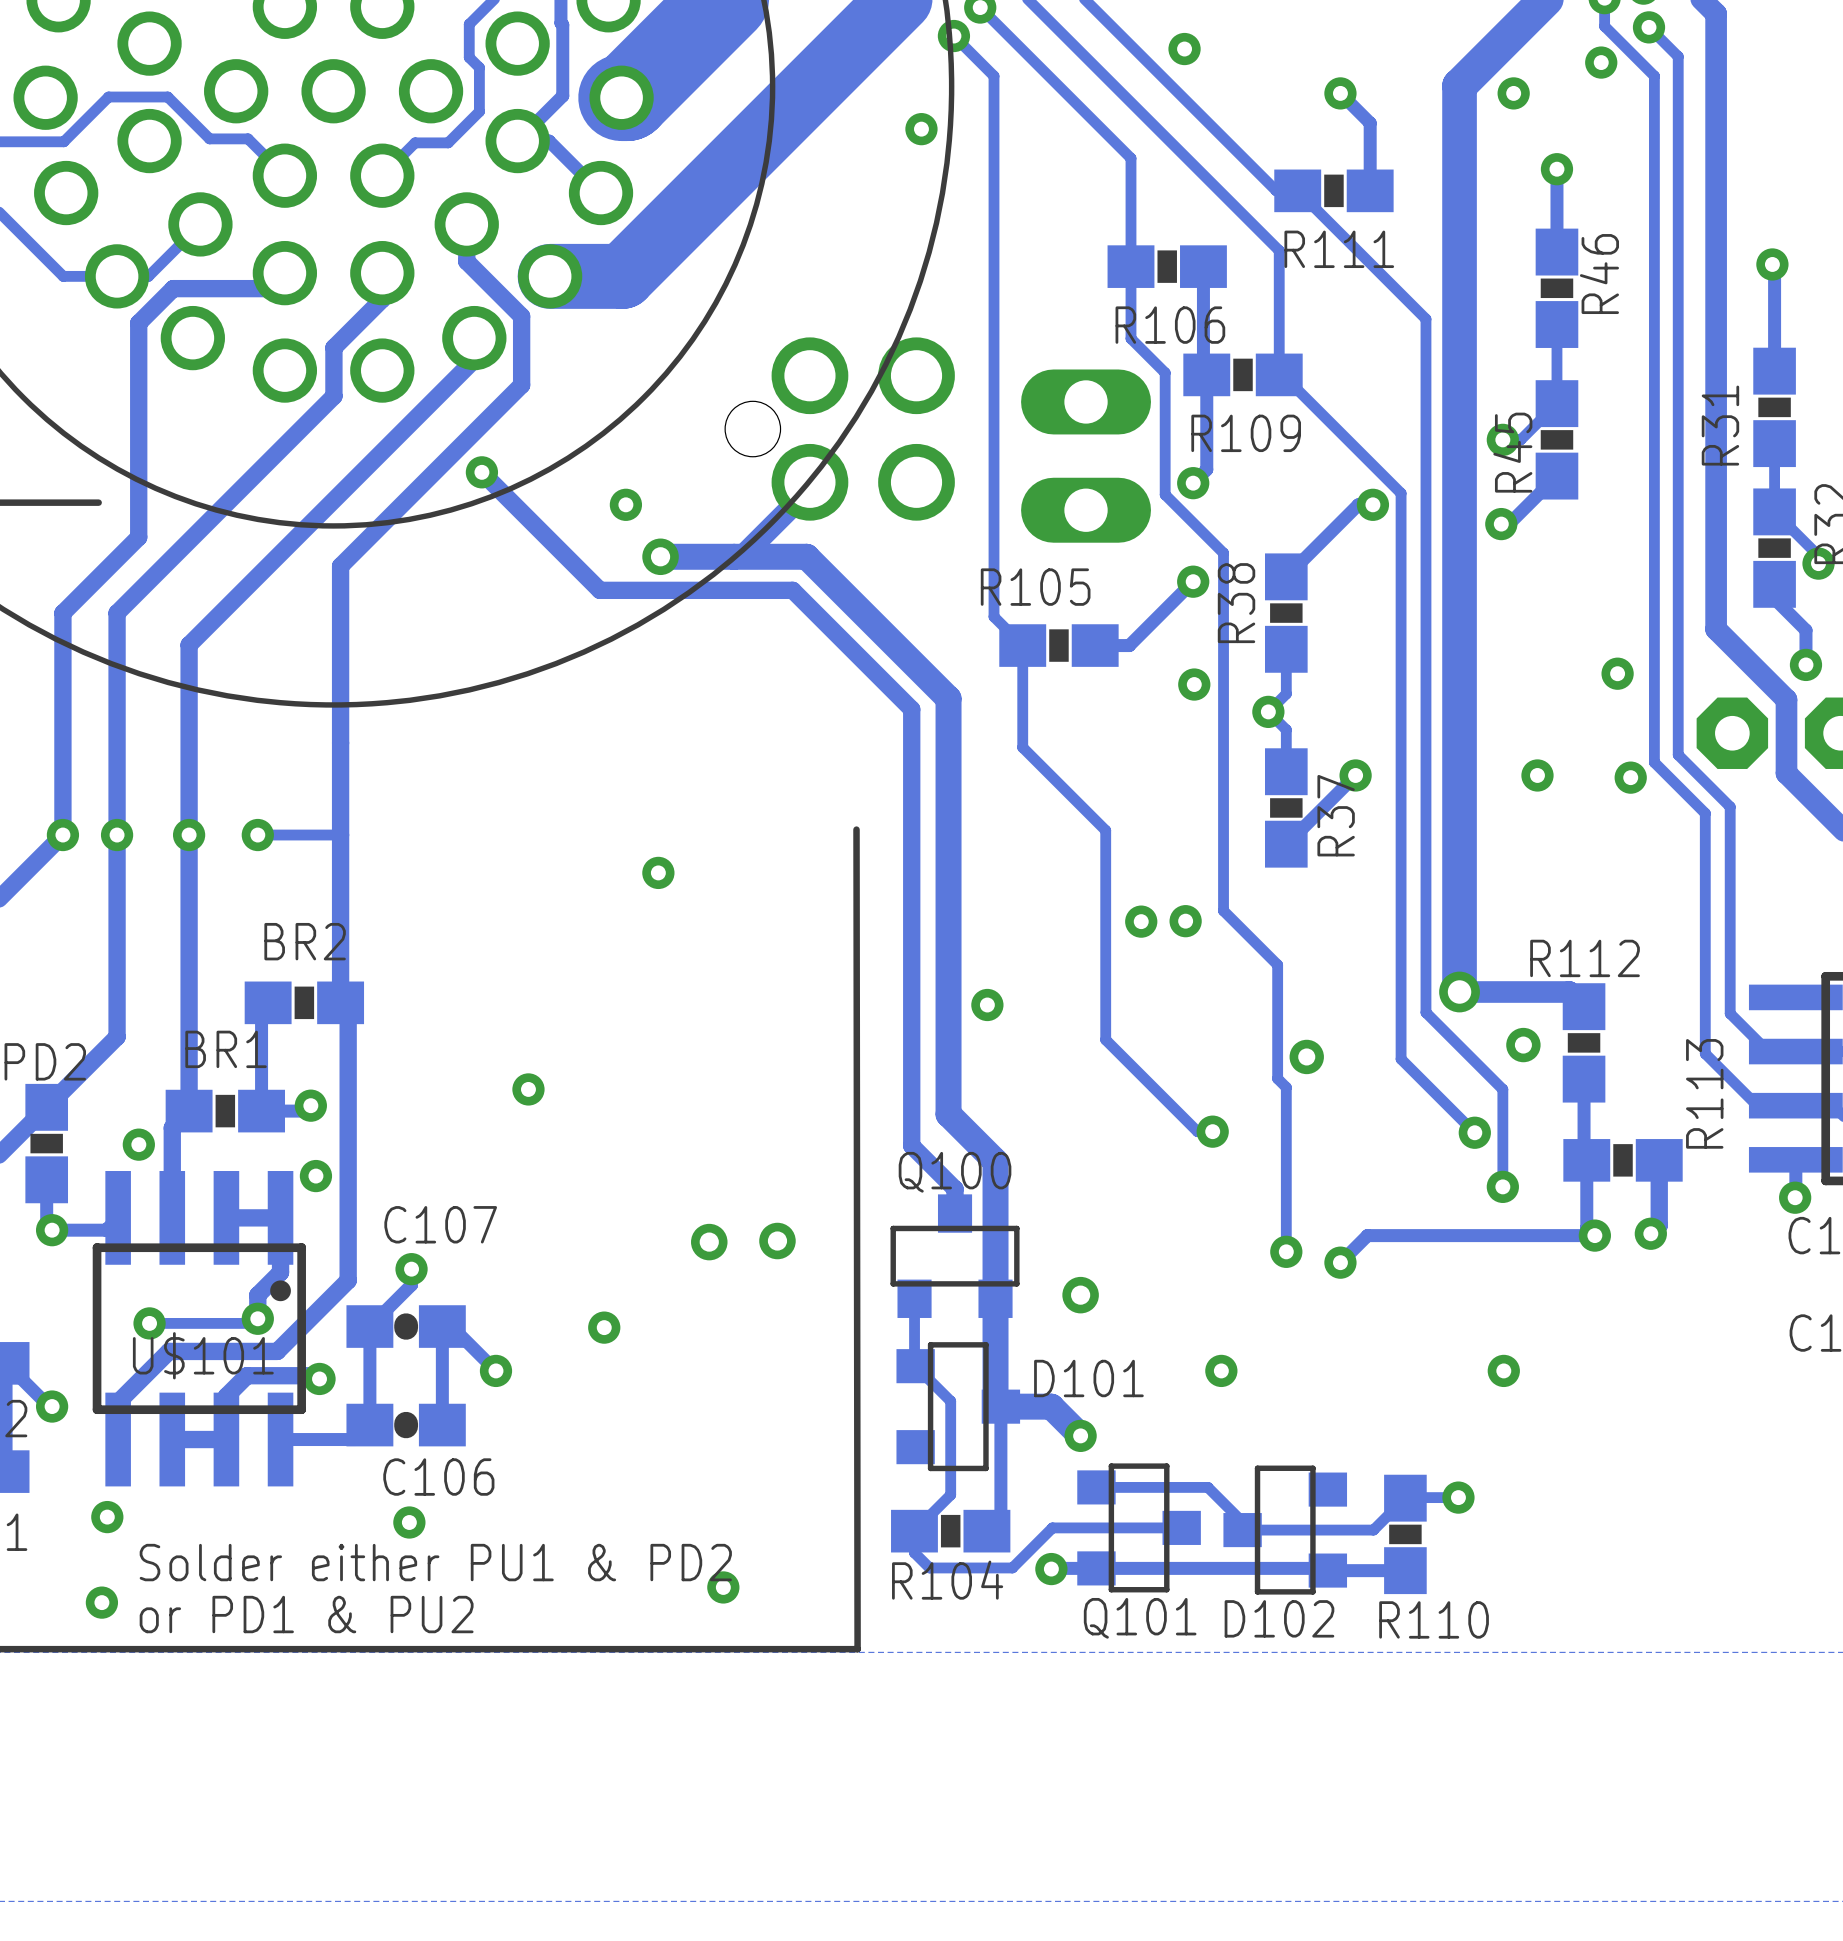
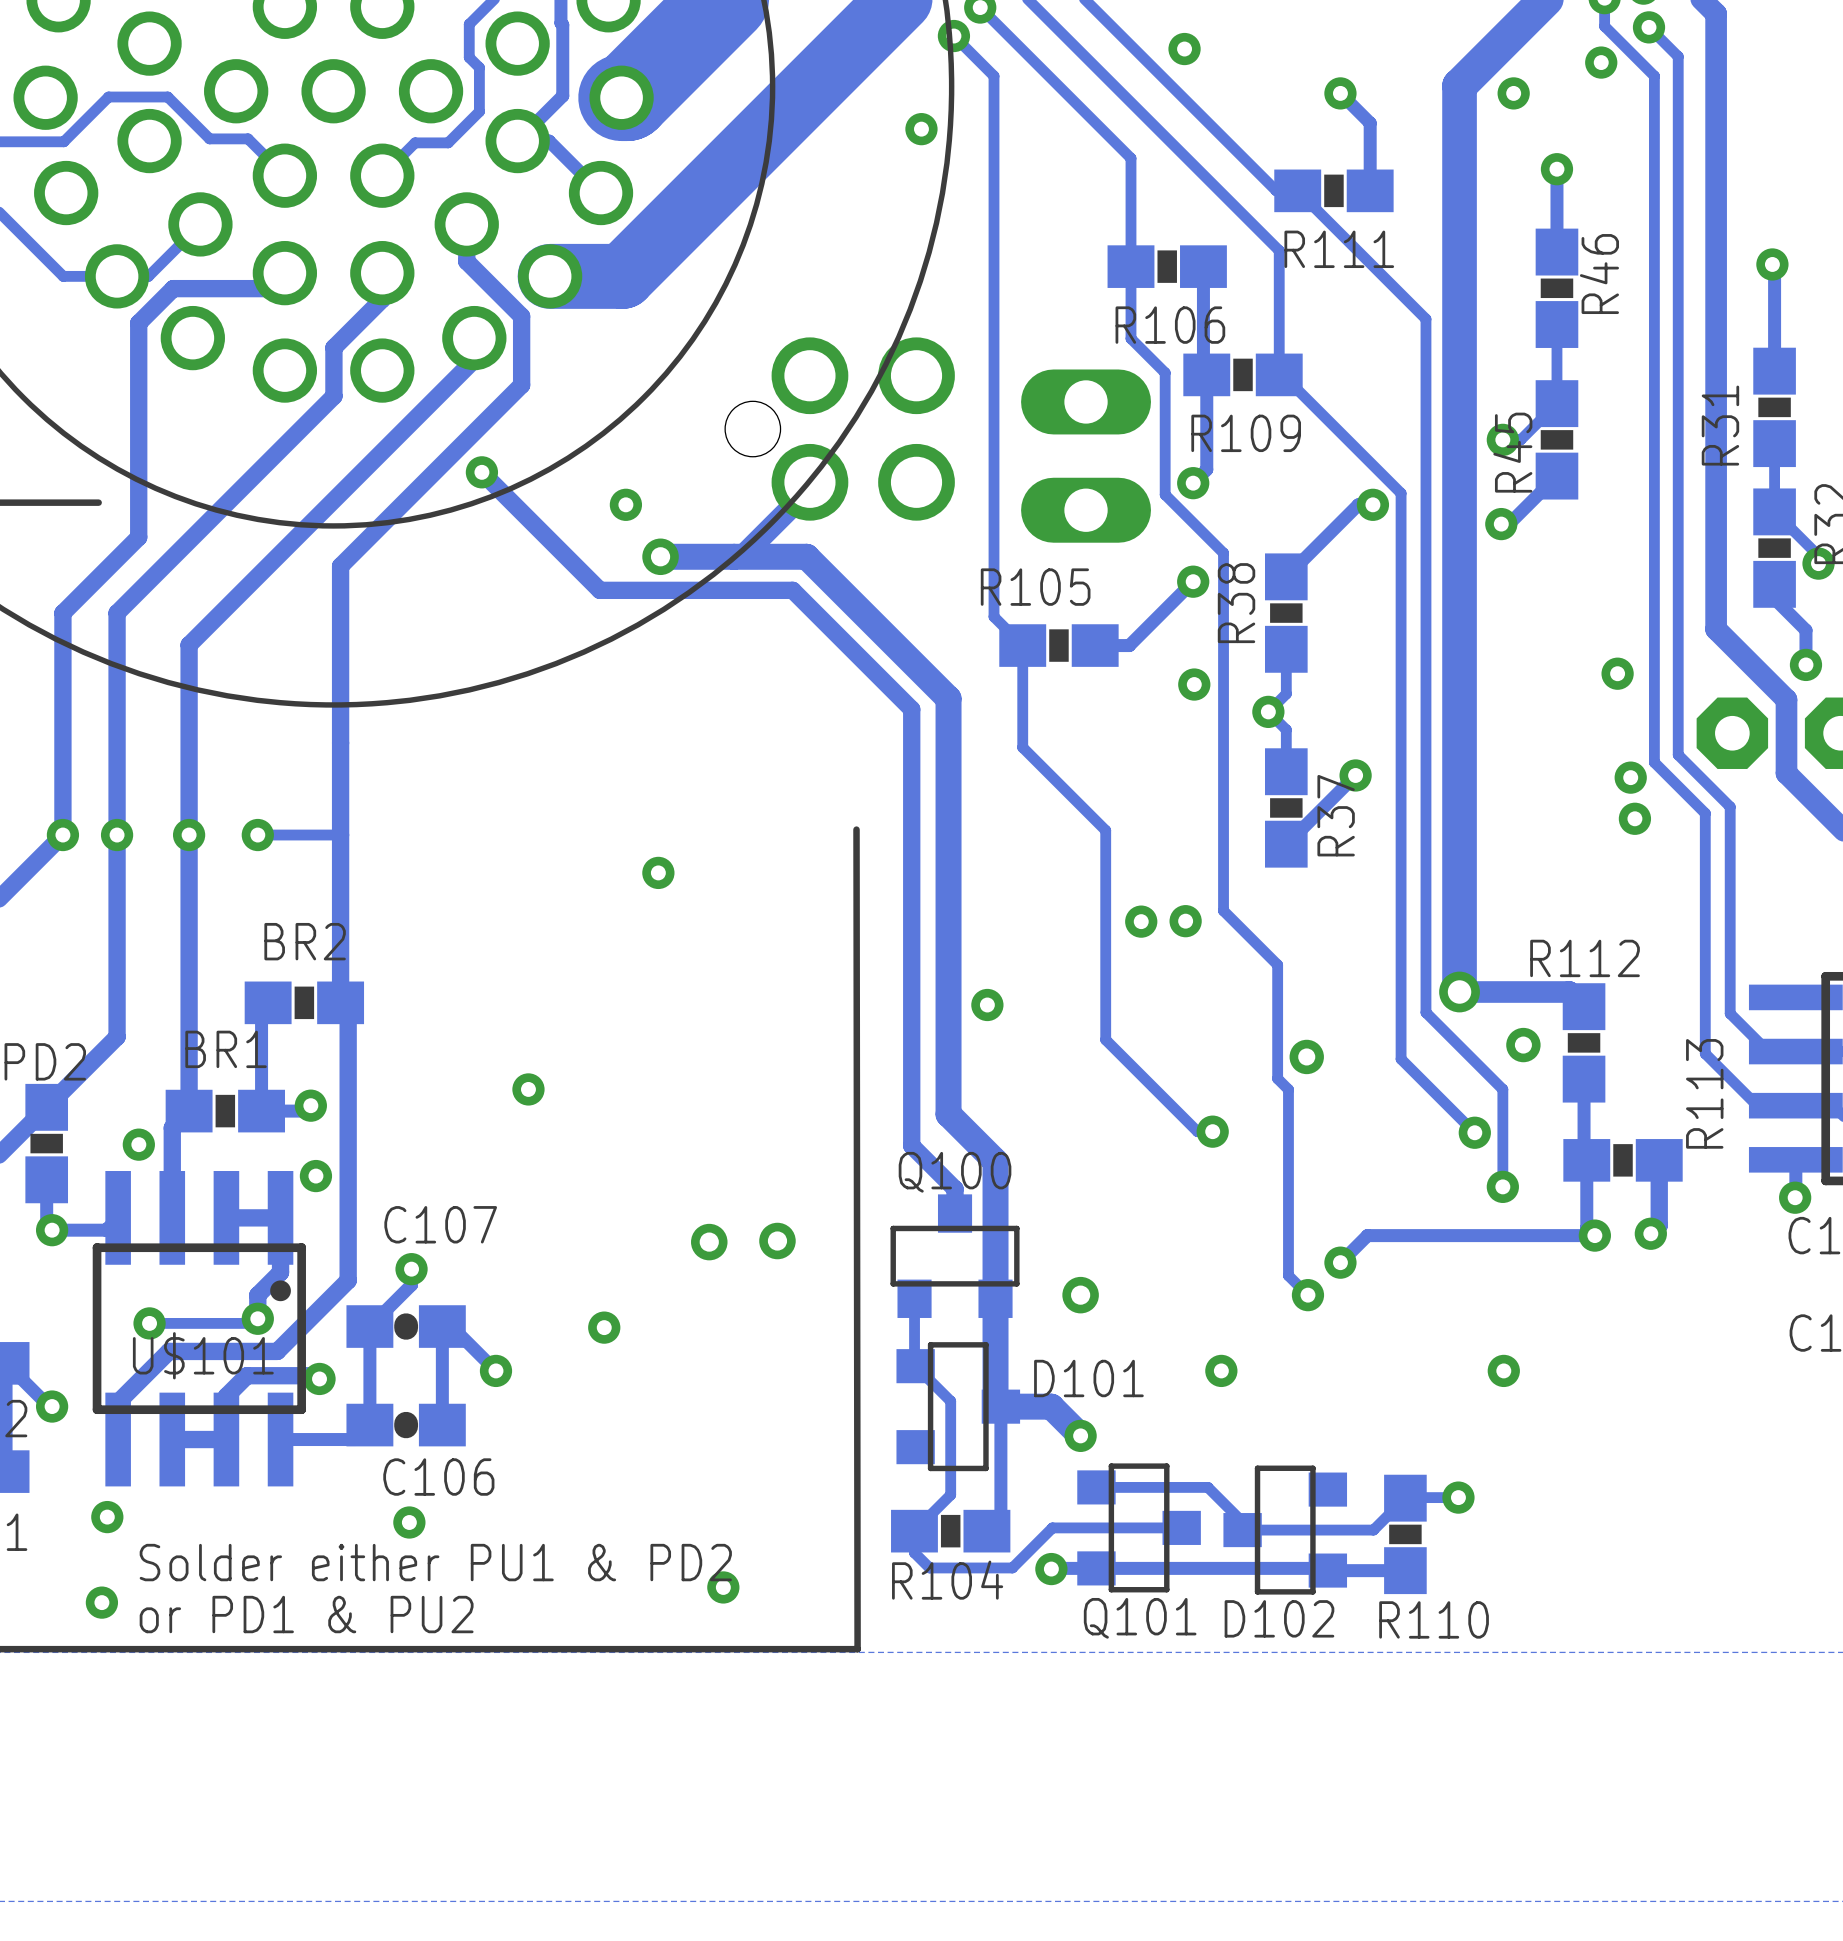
via position: (1537, 775) -> (1634, 818)
track: (1286, 1087) (1286, 1251) -> (1286, 1087) (1288, 1089) (1288, 1275) (1307, 1295)
via position: (1286, 1251) -> (1307, 1295)

